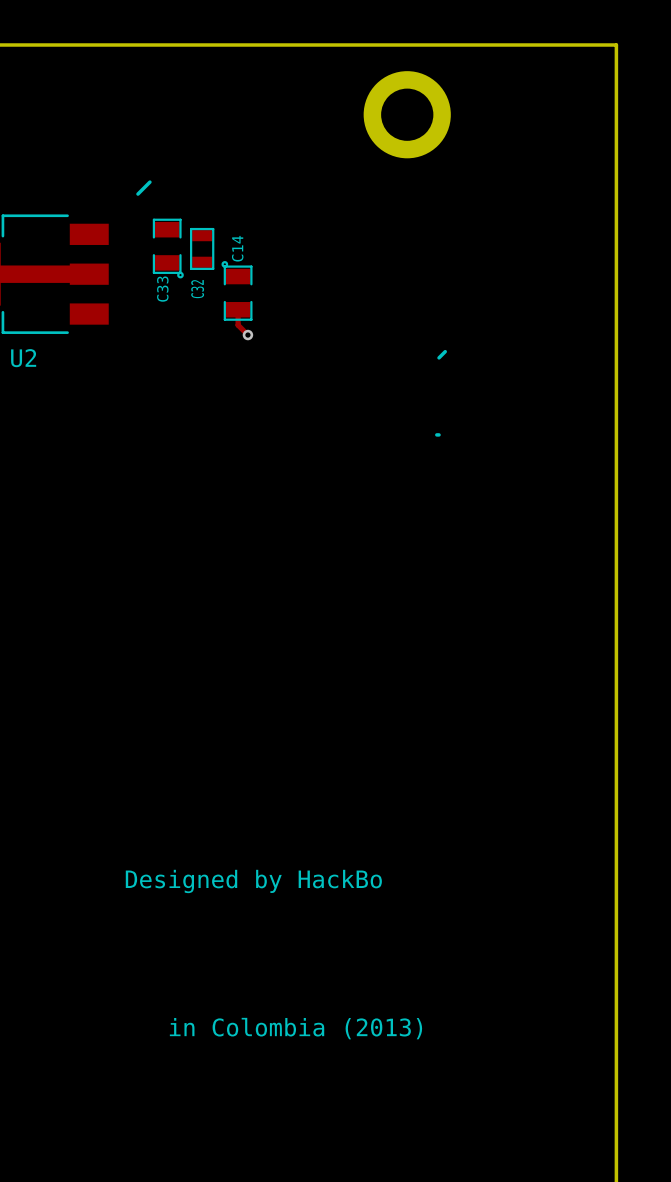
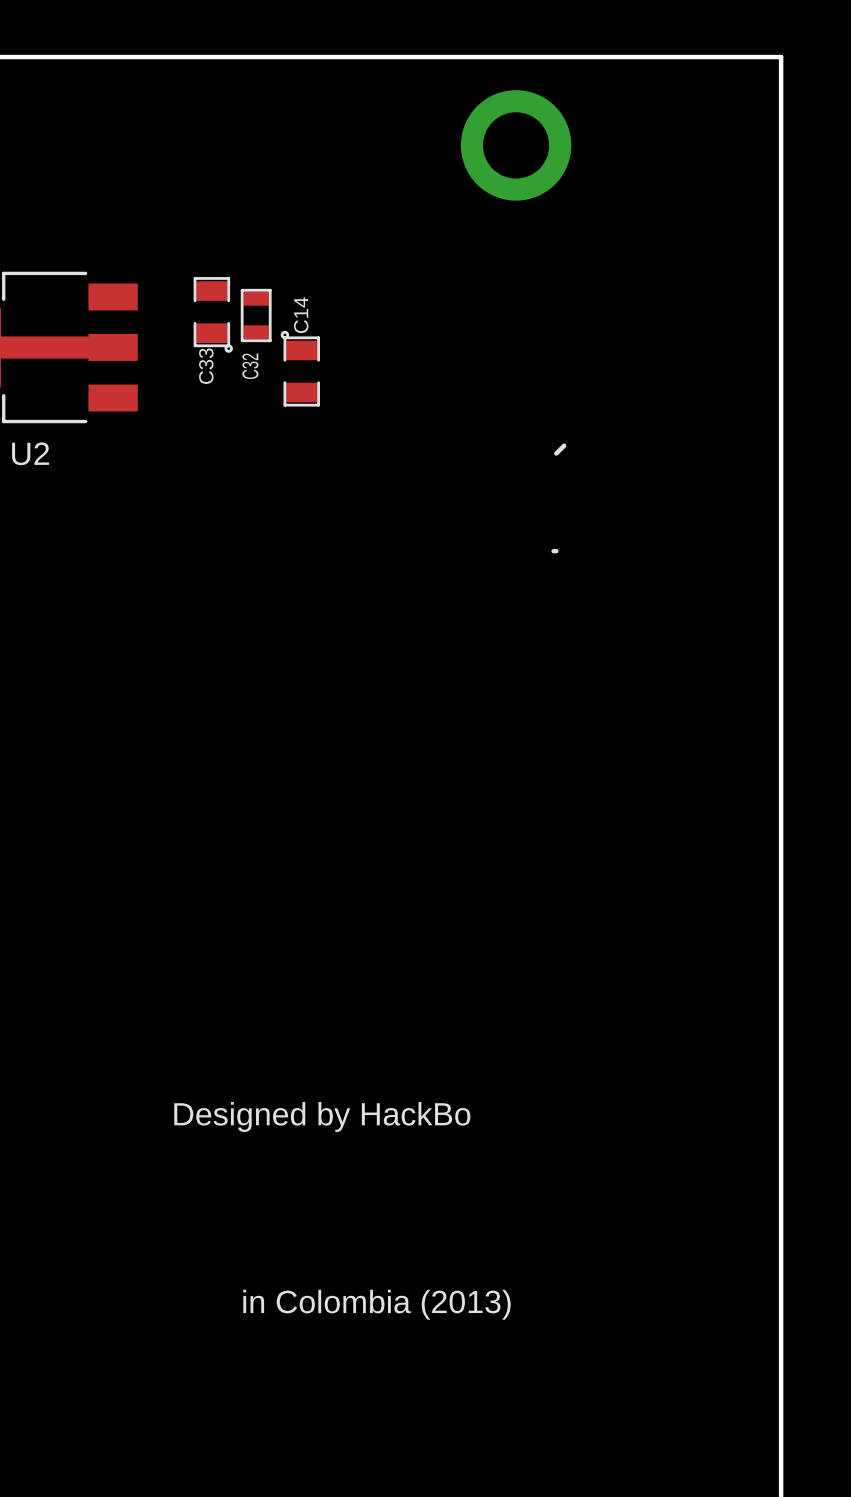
line: (149, 182) (137, 194) -> none
track: (238, 309) (238, 325) (247, 335) -> none
via: (247, 335) -> none

